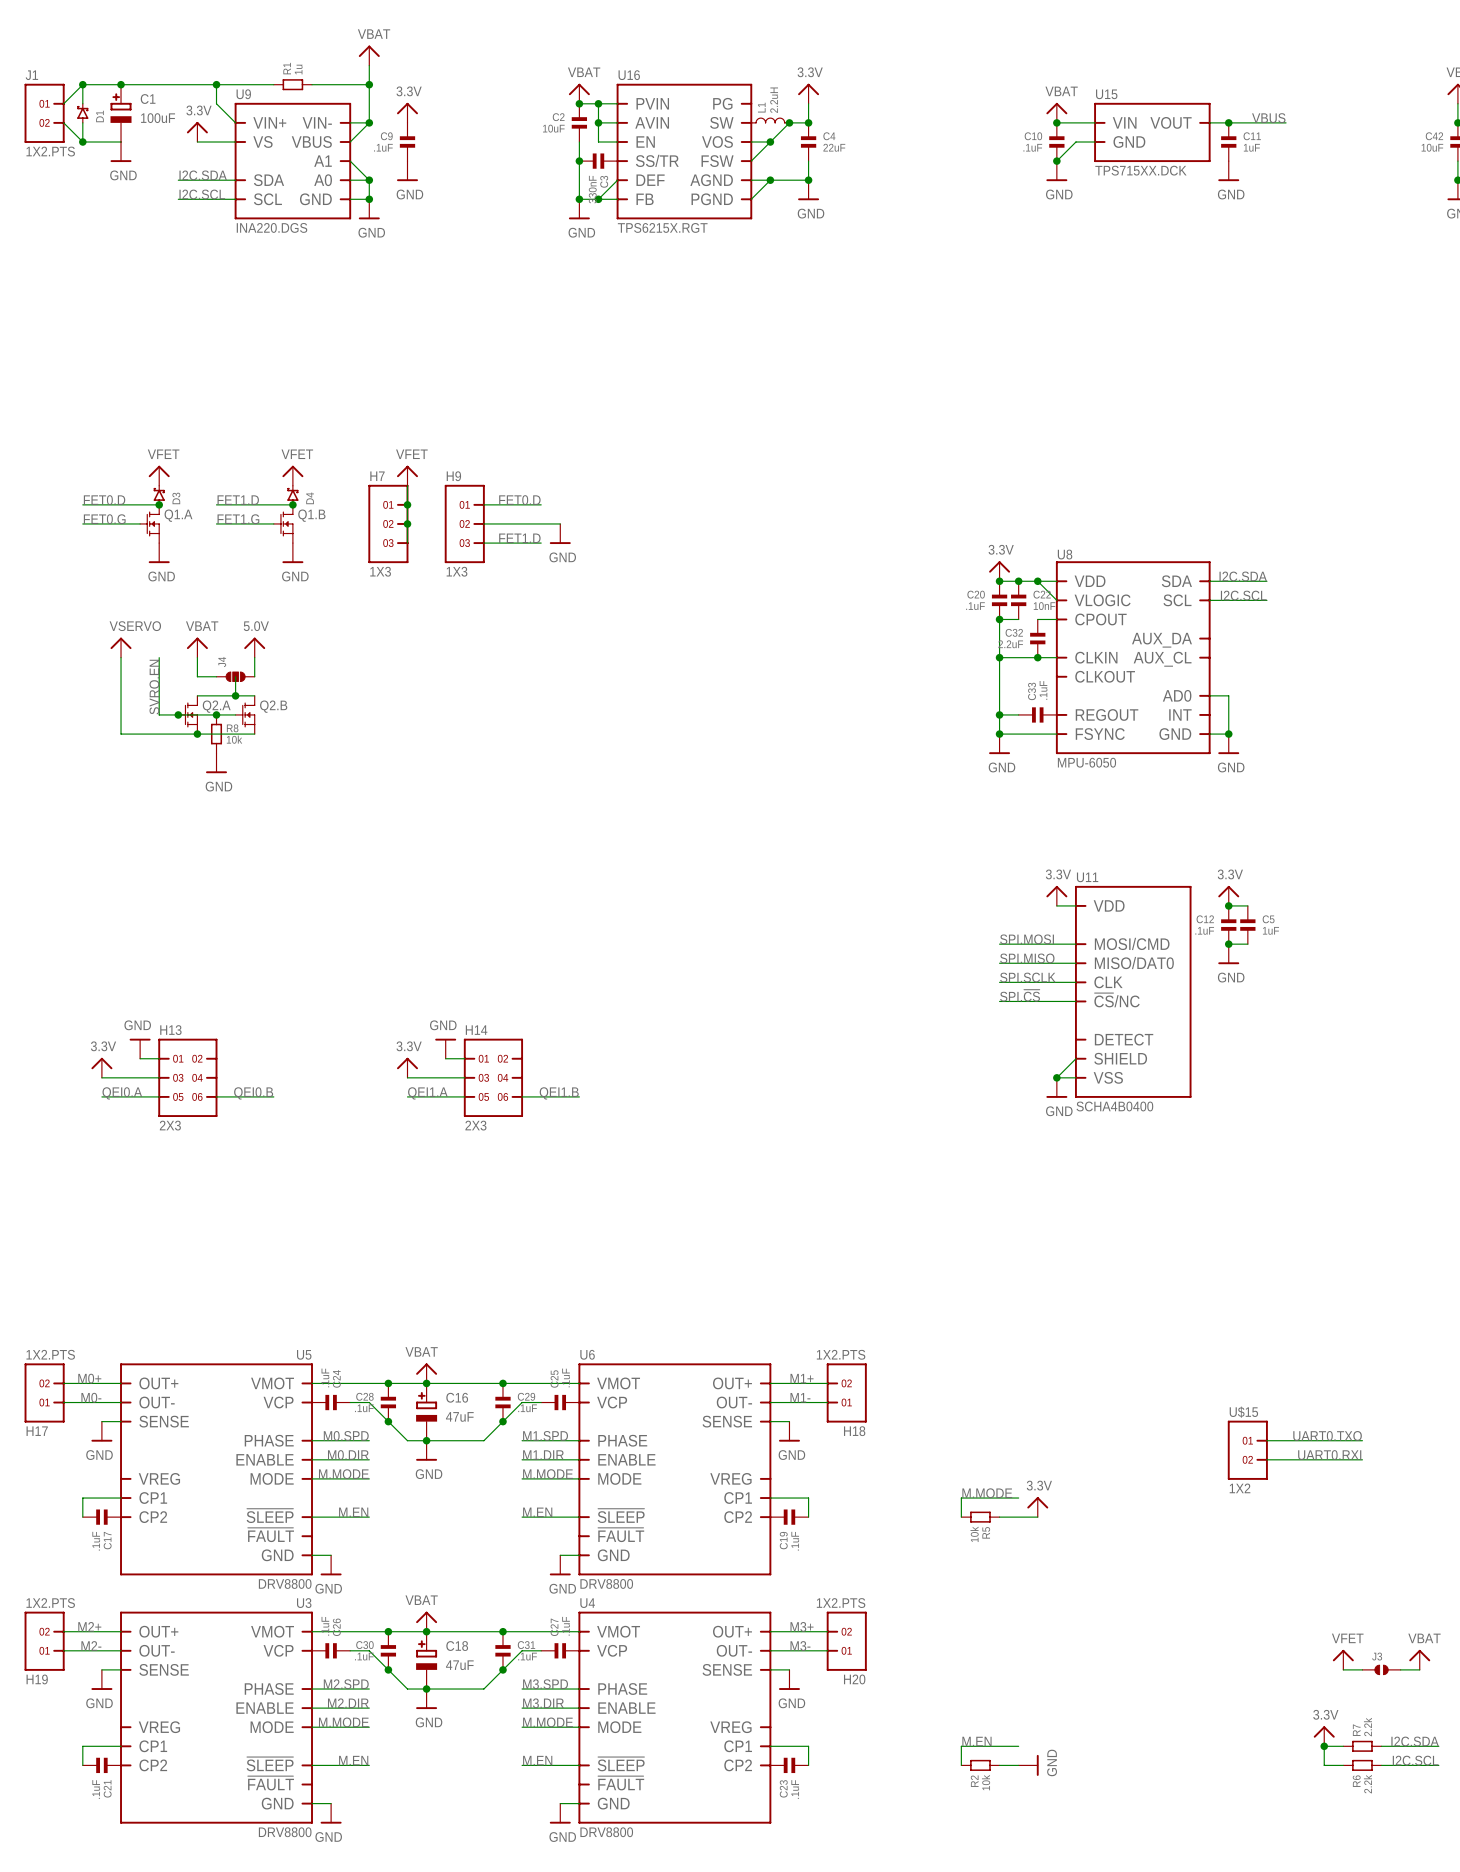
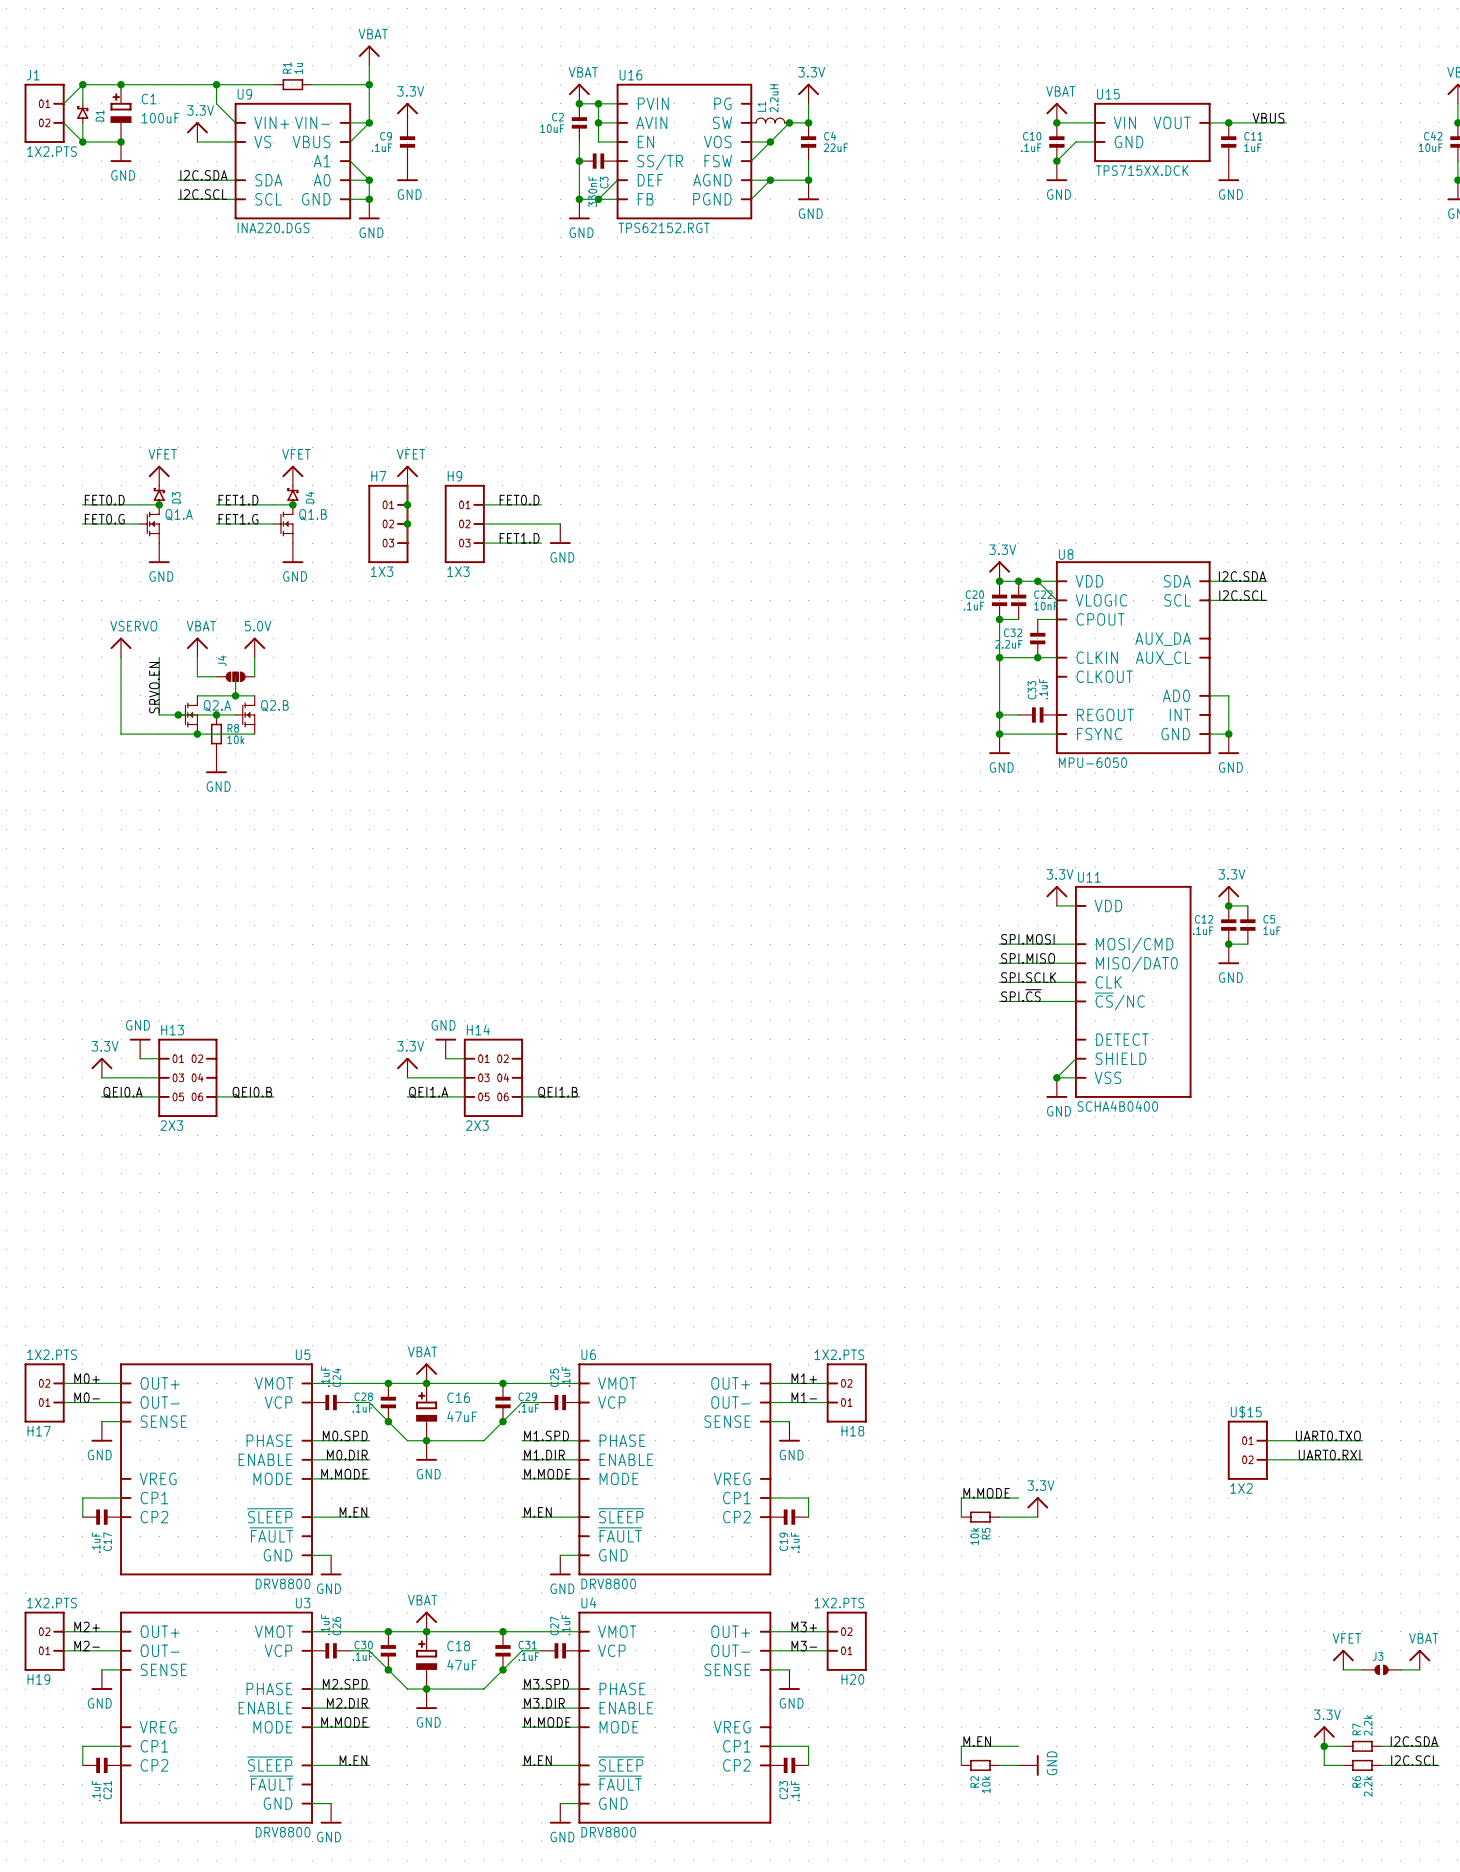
junction: none -> (121, 142)
U16 value: TPS6215X.RGT (662, 227) -> TPS62152.RGT (664, 227)
label: SVRO.EN (154, 687) -> SRVO.EN (154, 687)

